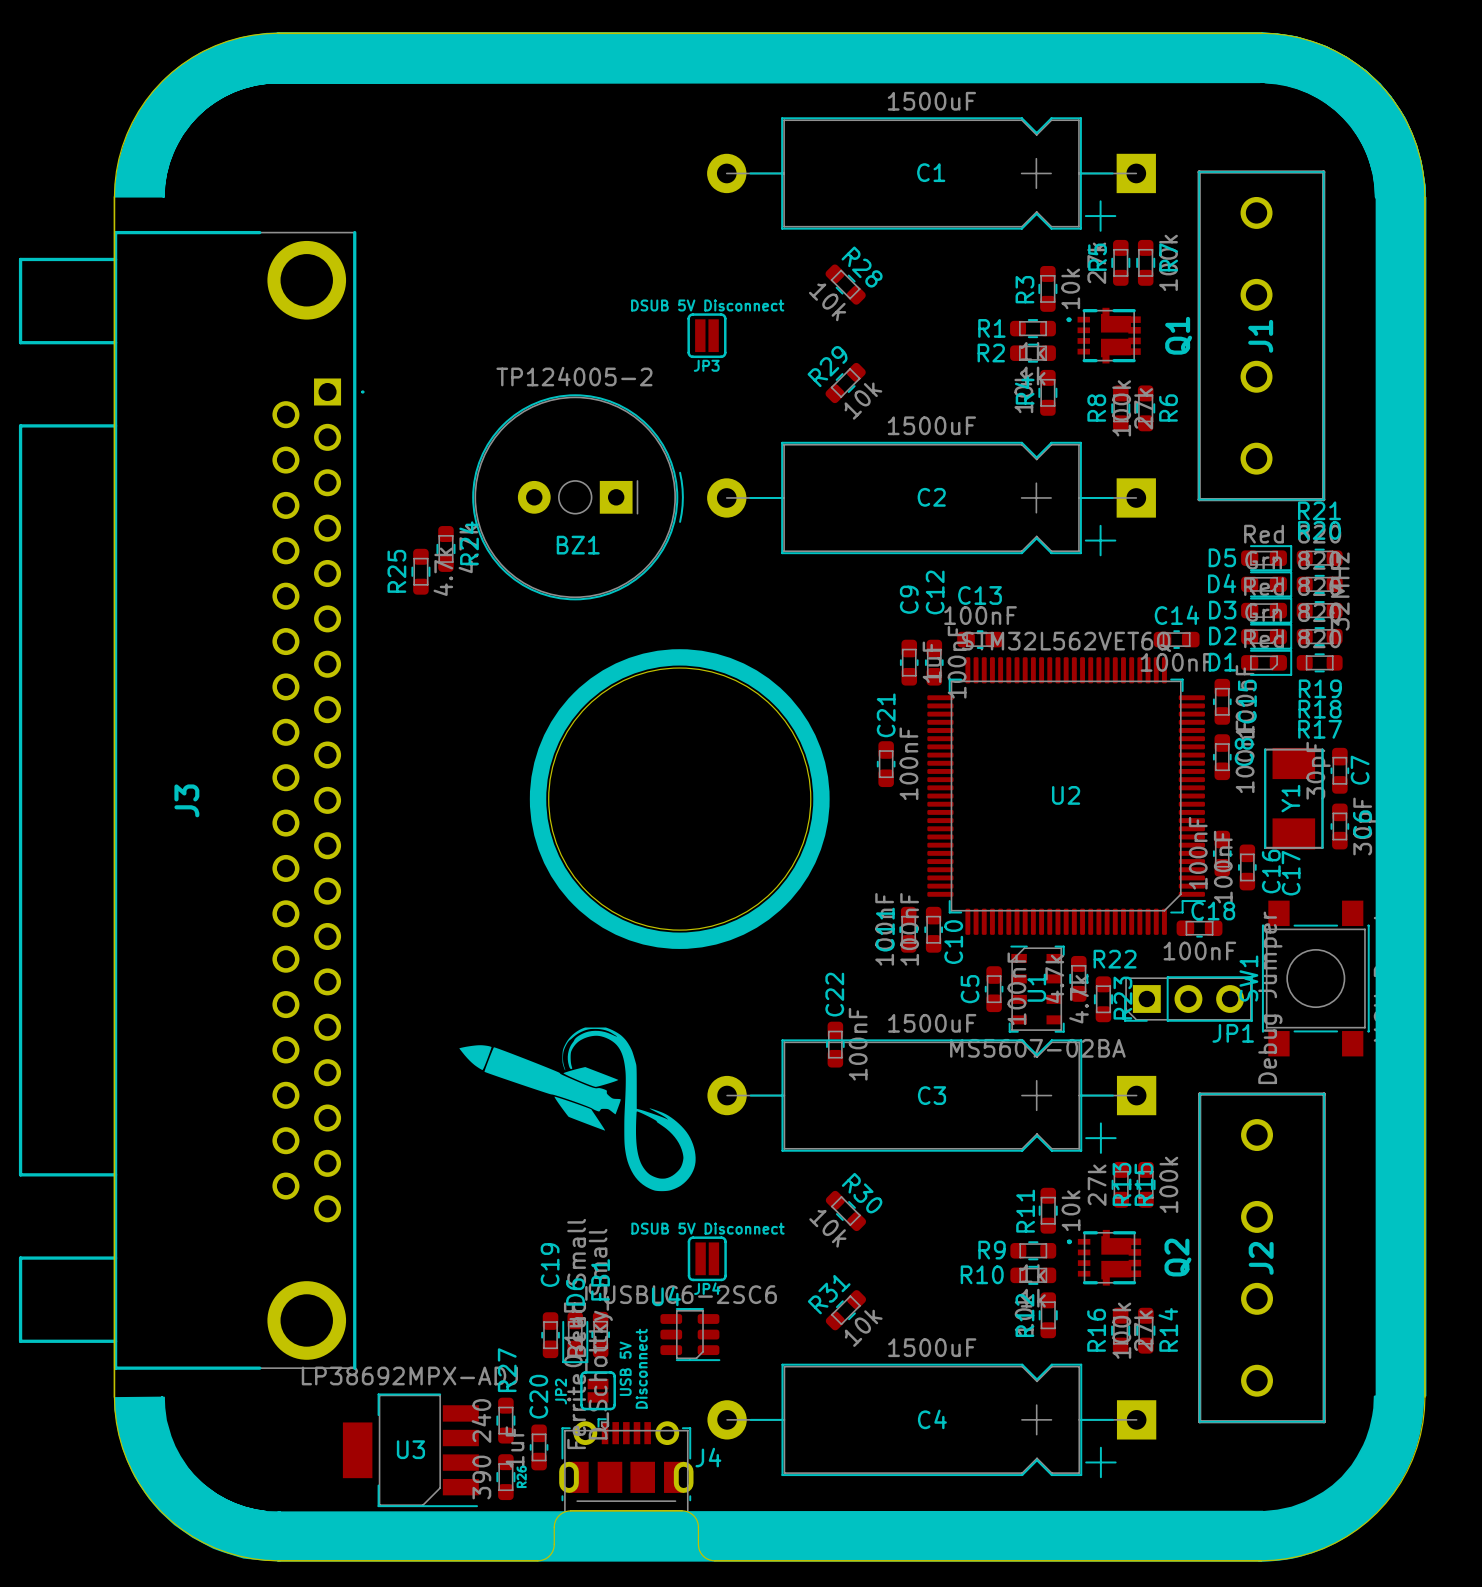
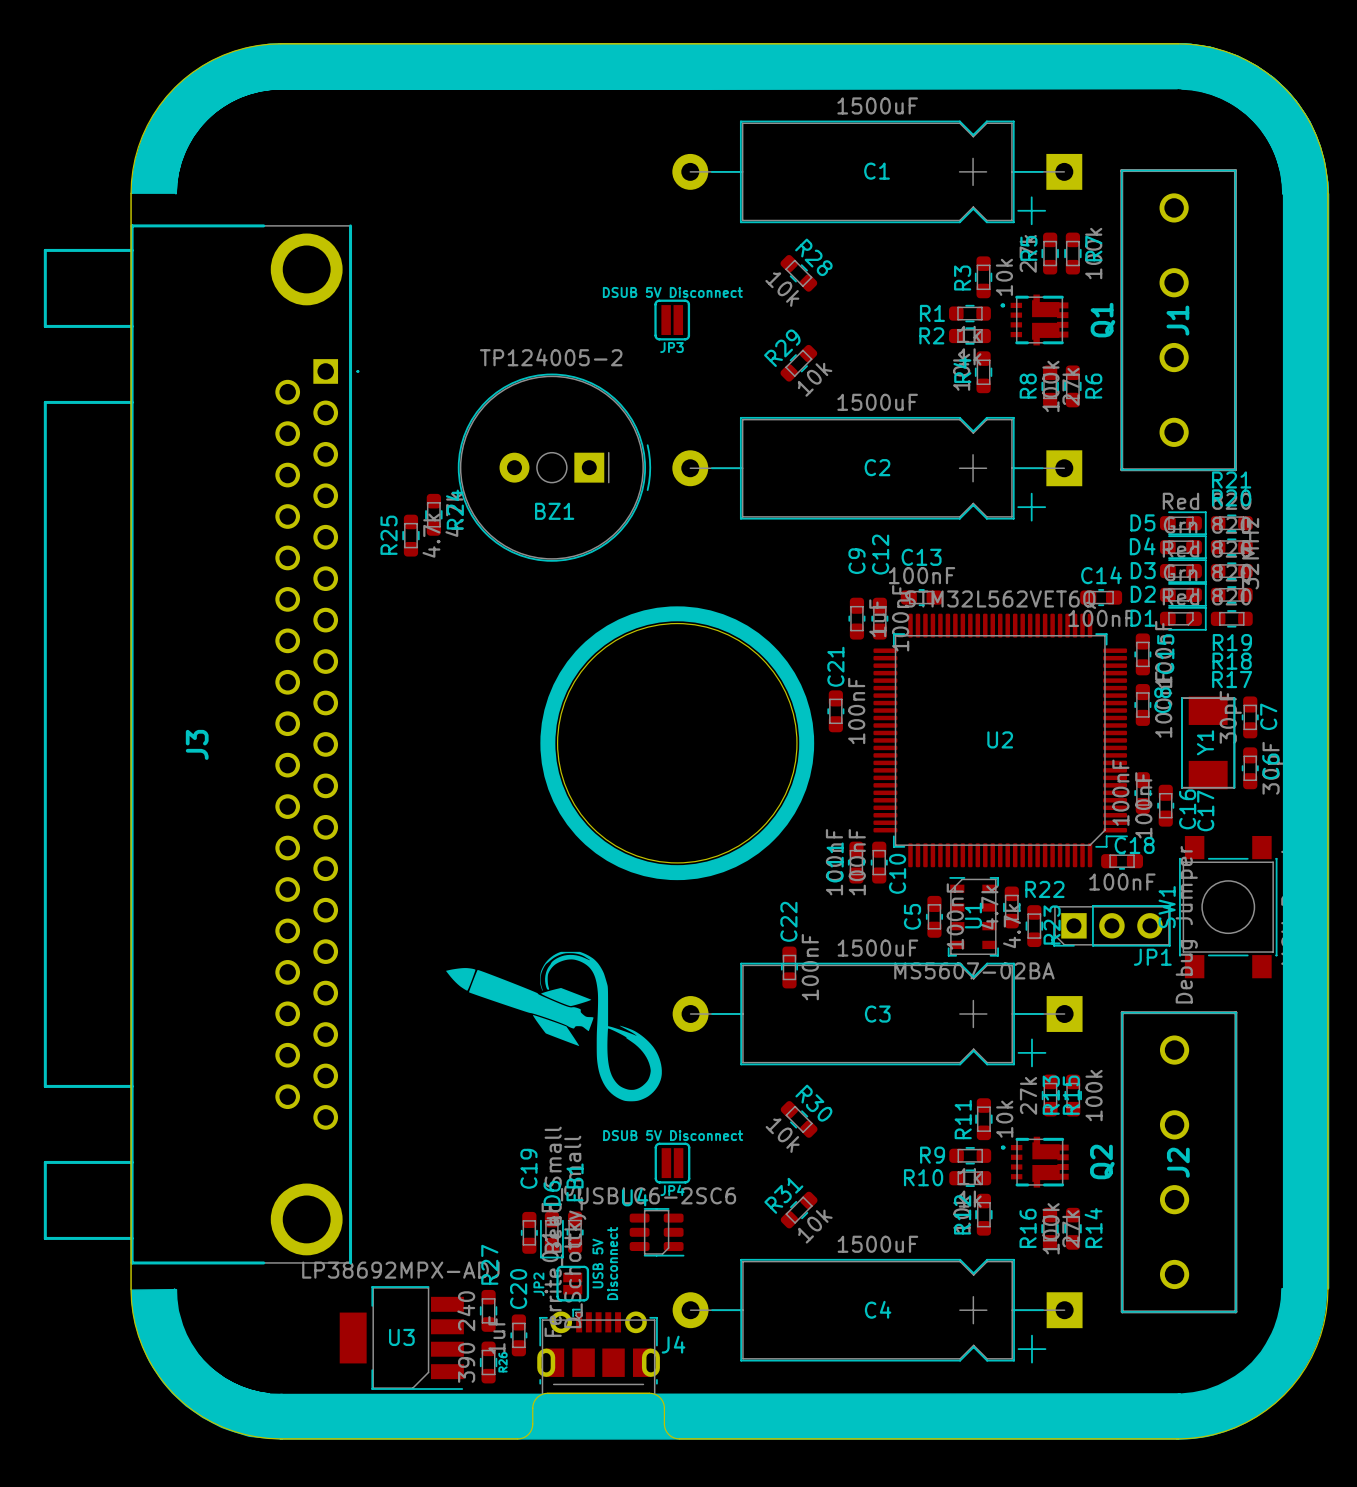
drawing position: (679, 799) -> (677, 743)
round board edge position: (679, 799) -> (677, 743)

